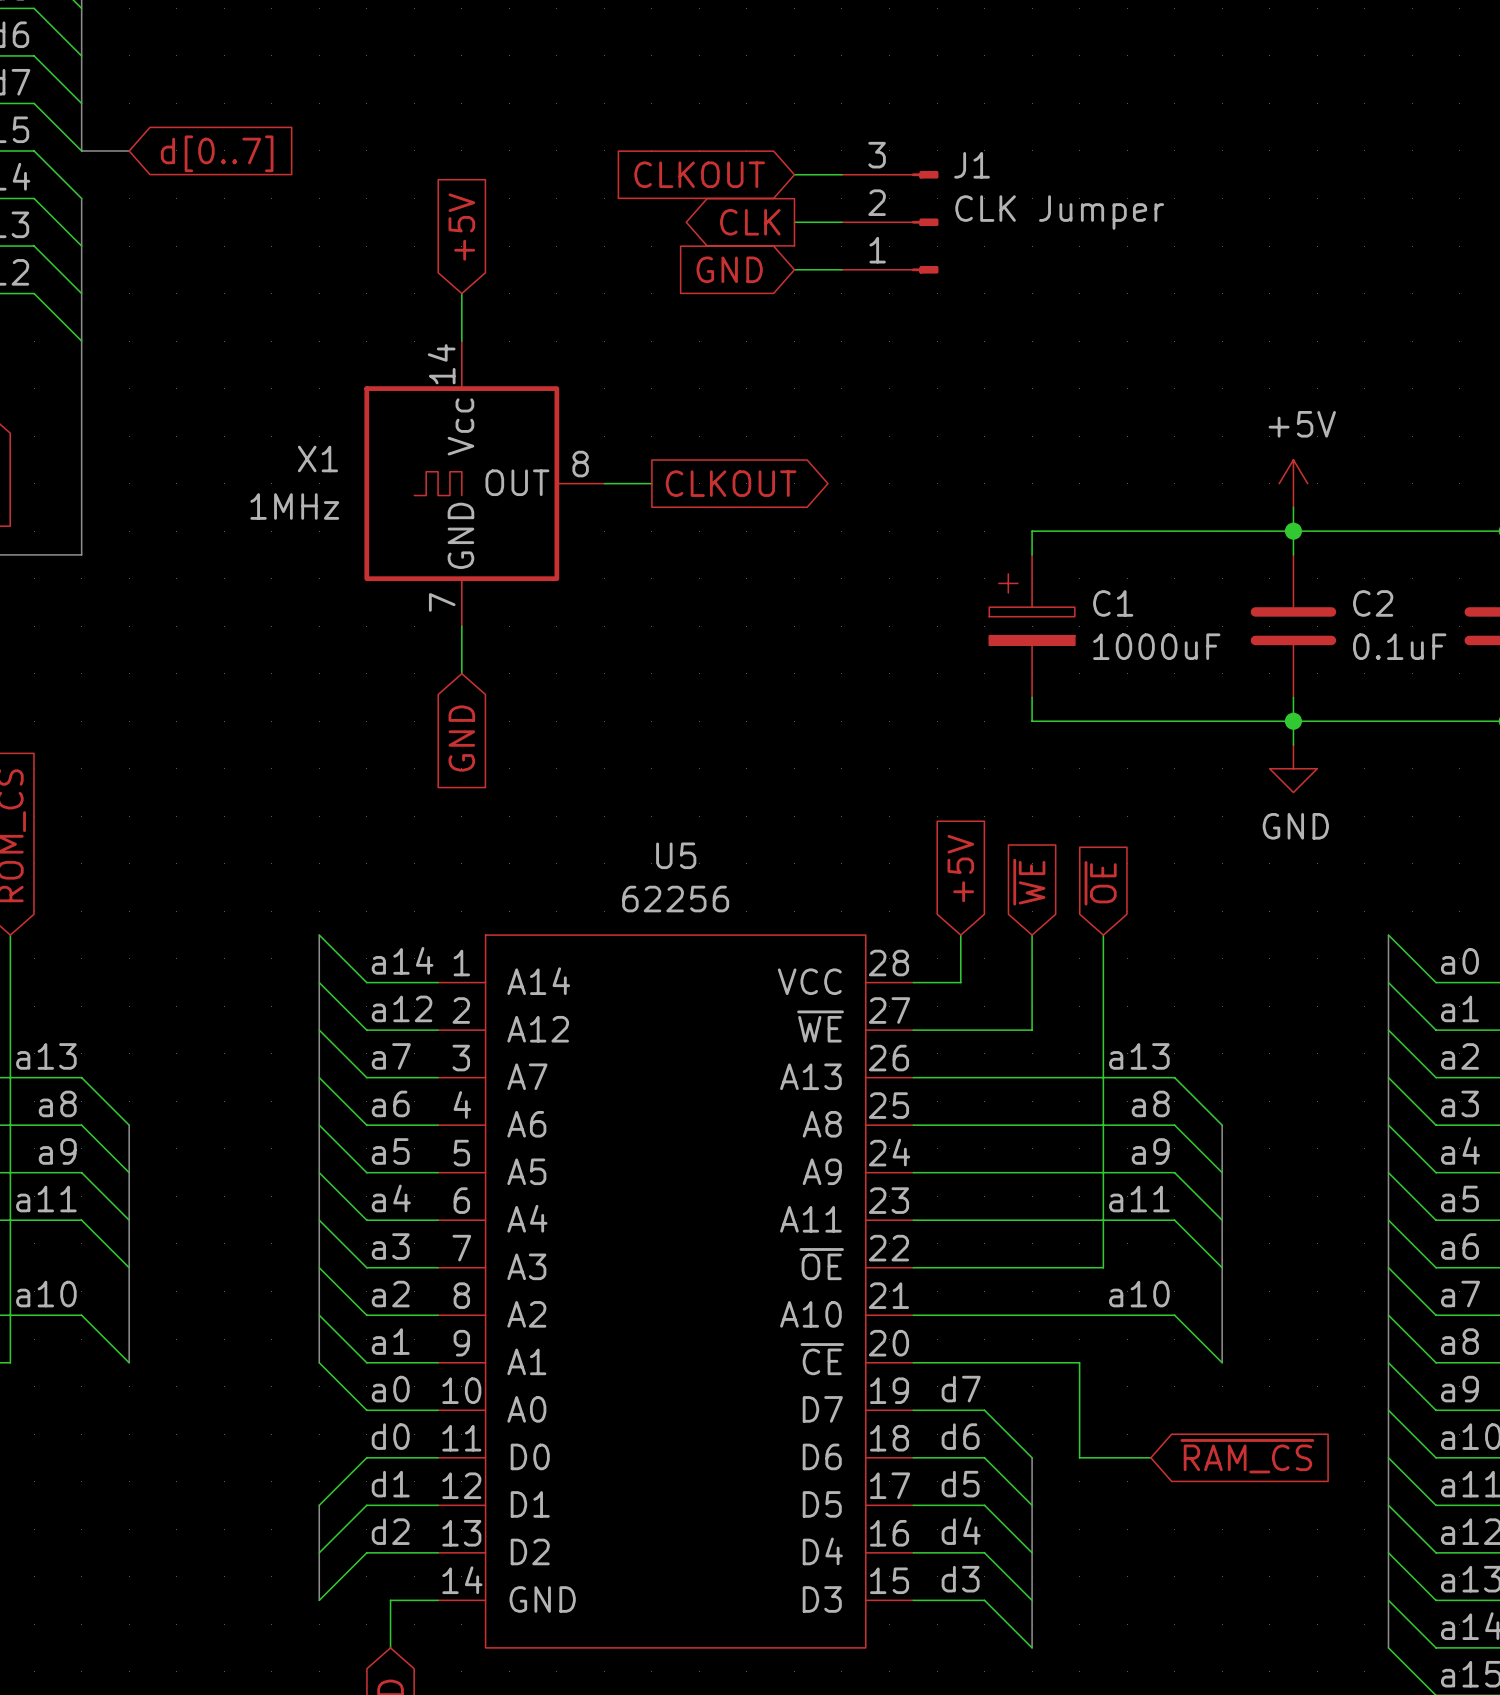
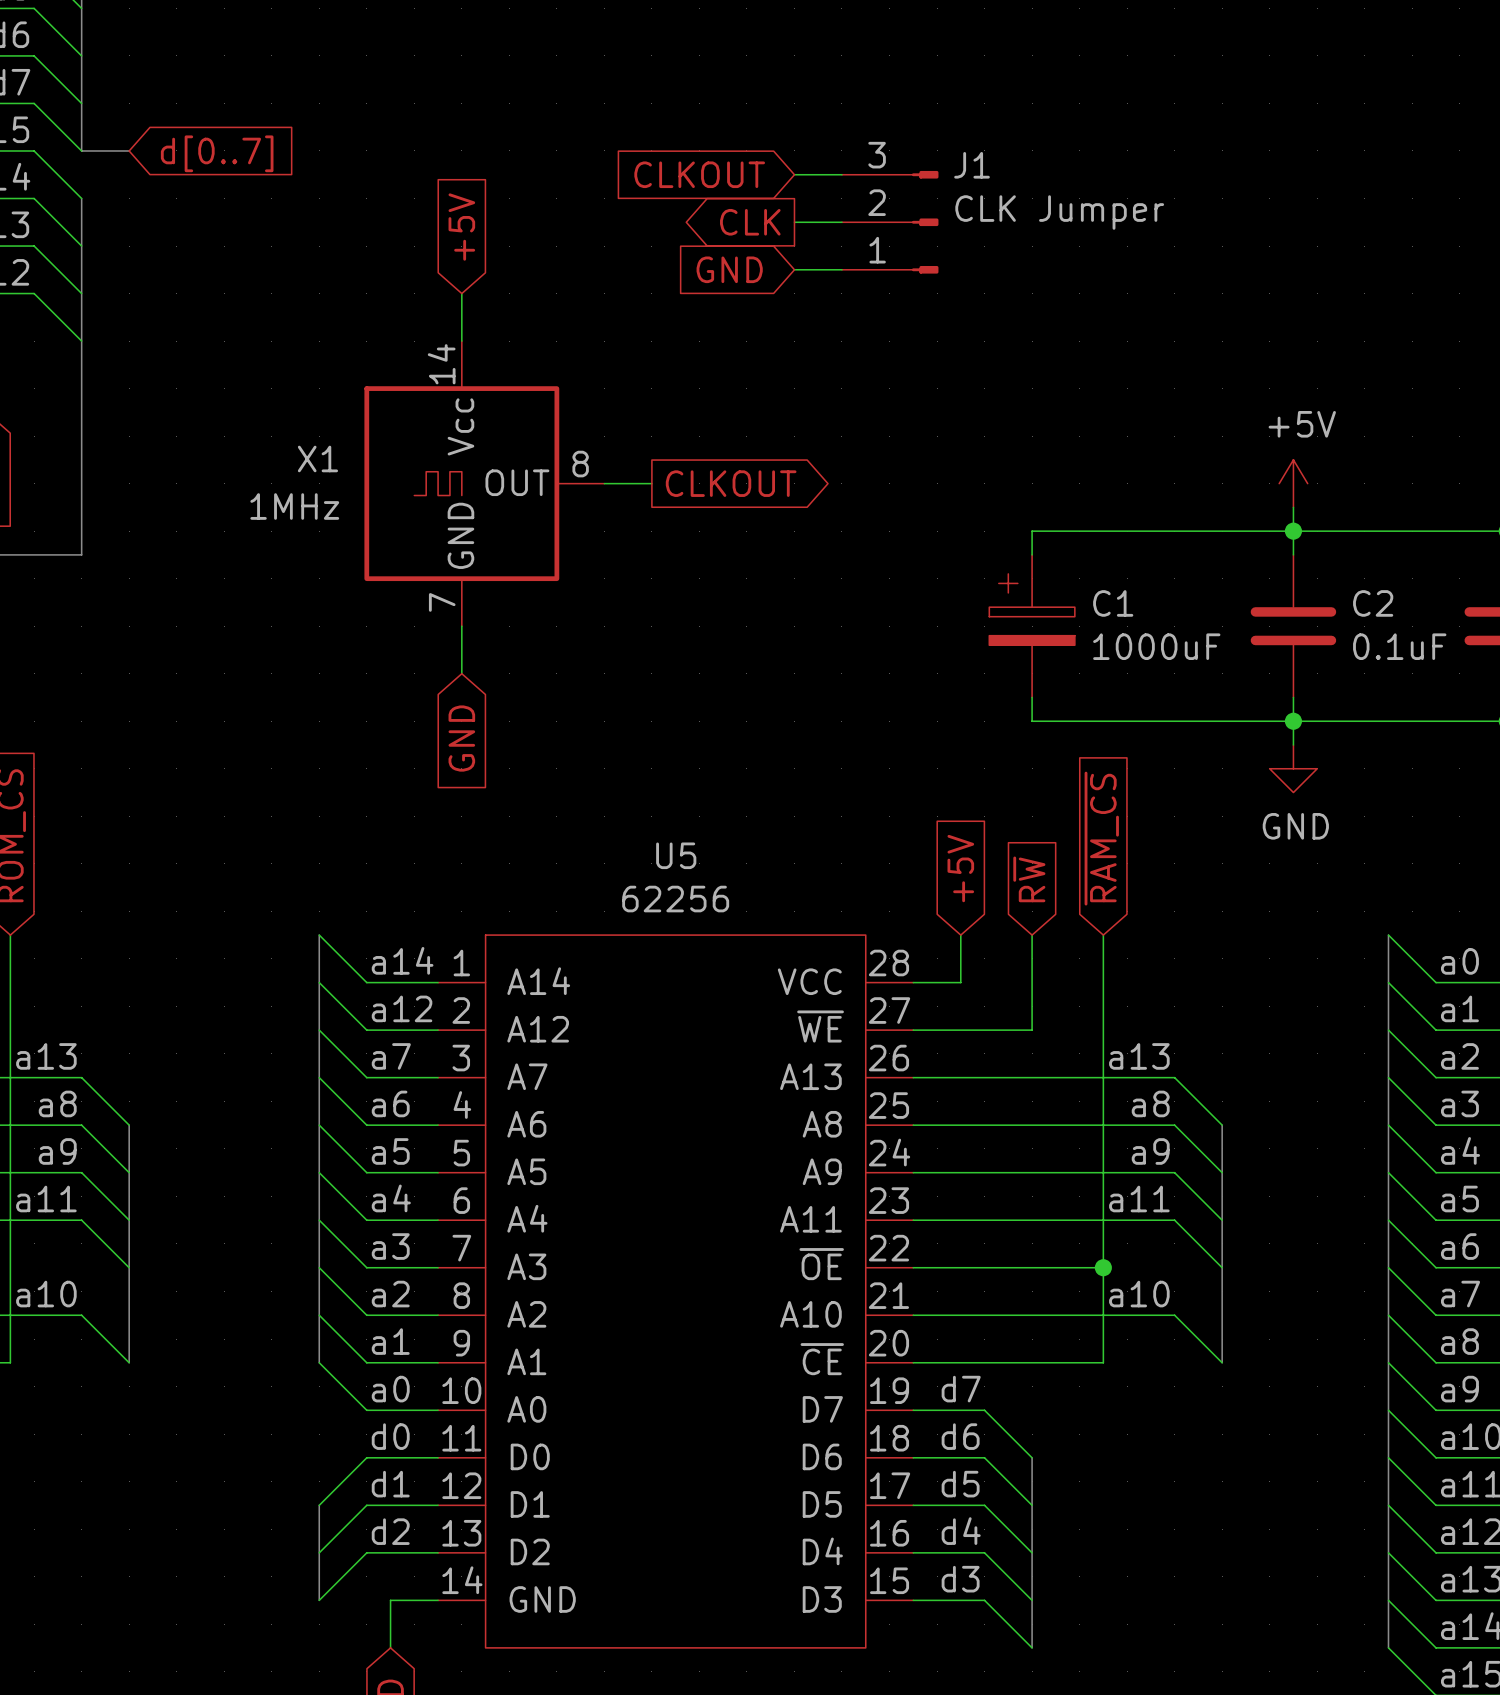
global label: ~{WE} (1029, 882) -> R~{W} (1029, 879)
global label: ~{OE} (1100, 883) -> ~{RAM_CS} (1101, 838)
junction: none -> (1103, 1267)
wire: (1079, 1362) (1079, 1457) (1150, 1457) -> (1079, 1362) (1103, 1362) (1103, 1267)
global label: ~{RAM_CS} (1247, 1456) -> none

